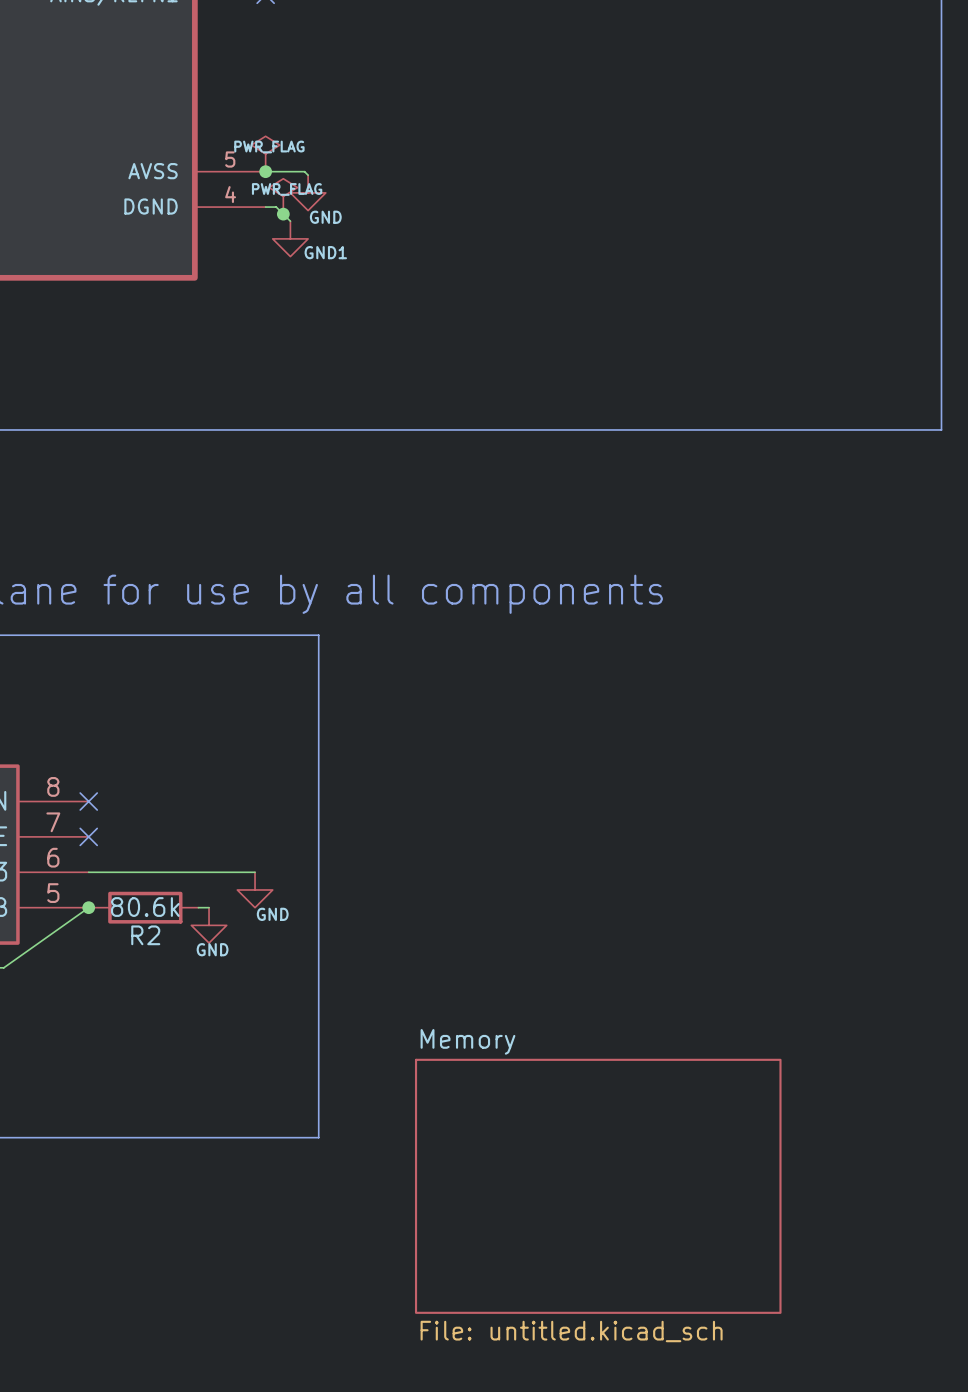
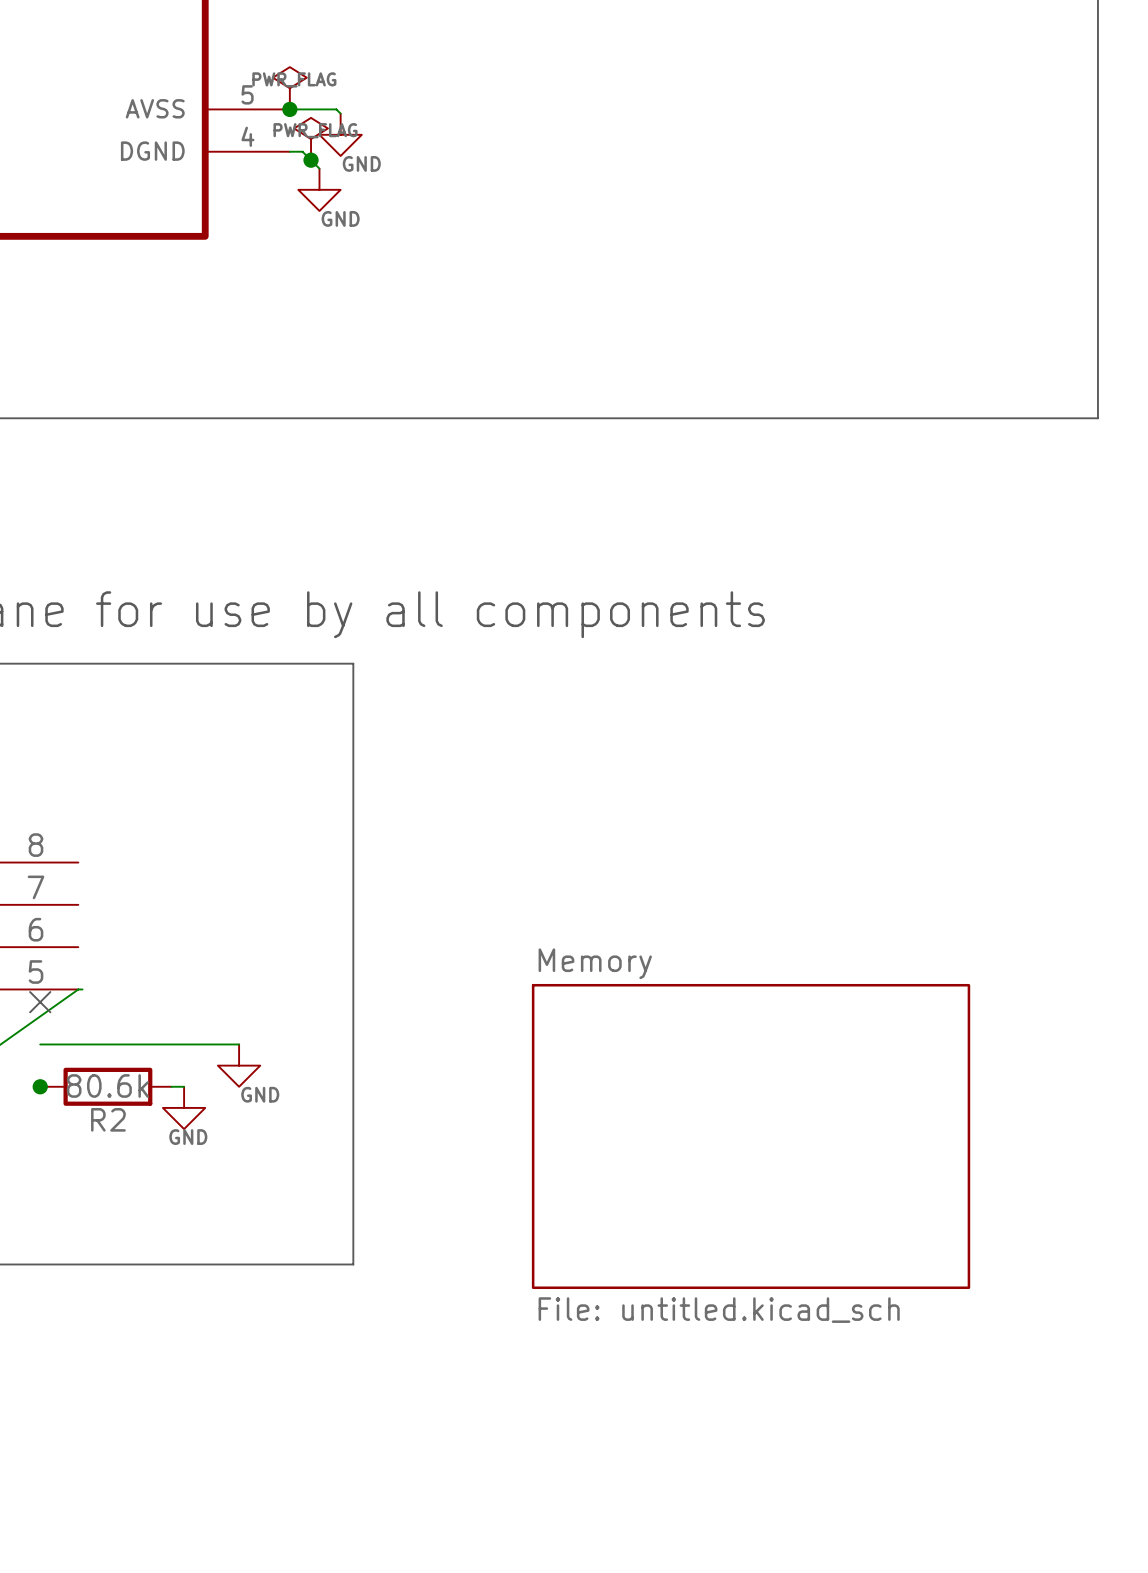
power symbol: GND1 (290, 238) -> GND (319, 189)
no-connect mark: (88, 801) -> none
no-connect mark: (88, 836) -> none
wire: (88, 872) (255, 872) -> (40, 1044) (239, 1044)
power symbol: GND (255, 889) -> none
junction: (88, 907) -> none
R2 position: (145, 907) -> (107, 1086)
wire: (198, 907) (209, 907) -> (171, 1086) (184, 1086)
no-connect mark: none -> (40, 1002)
power symbol: GND (209, 925) -> none
power symbol: none -> GND (239, 1065)
junction: none -> (40, 1086)
power symbol: none -> GND (184, 1107)
sheet Memory position: (598, 1186) -> (751, 1136)

